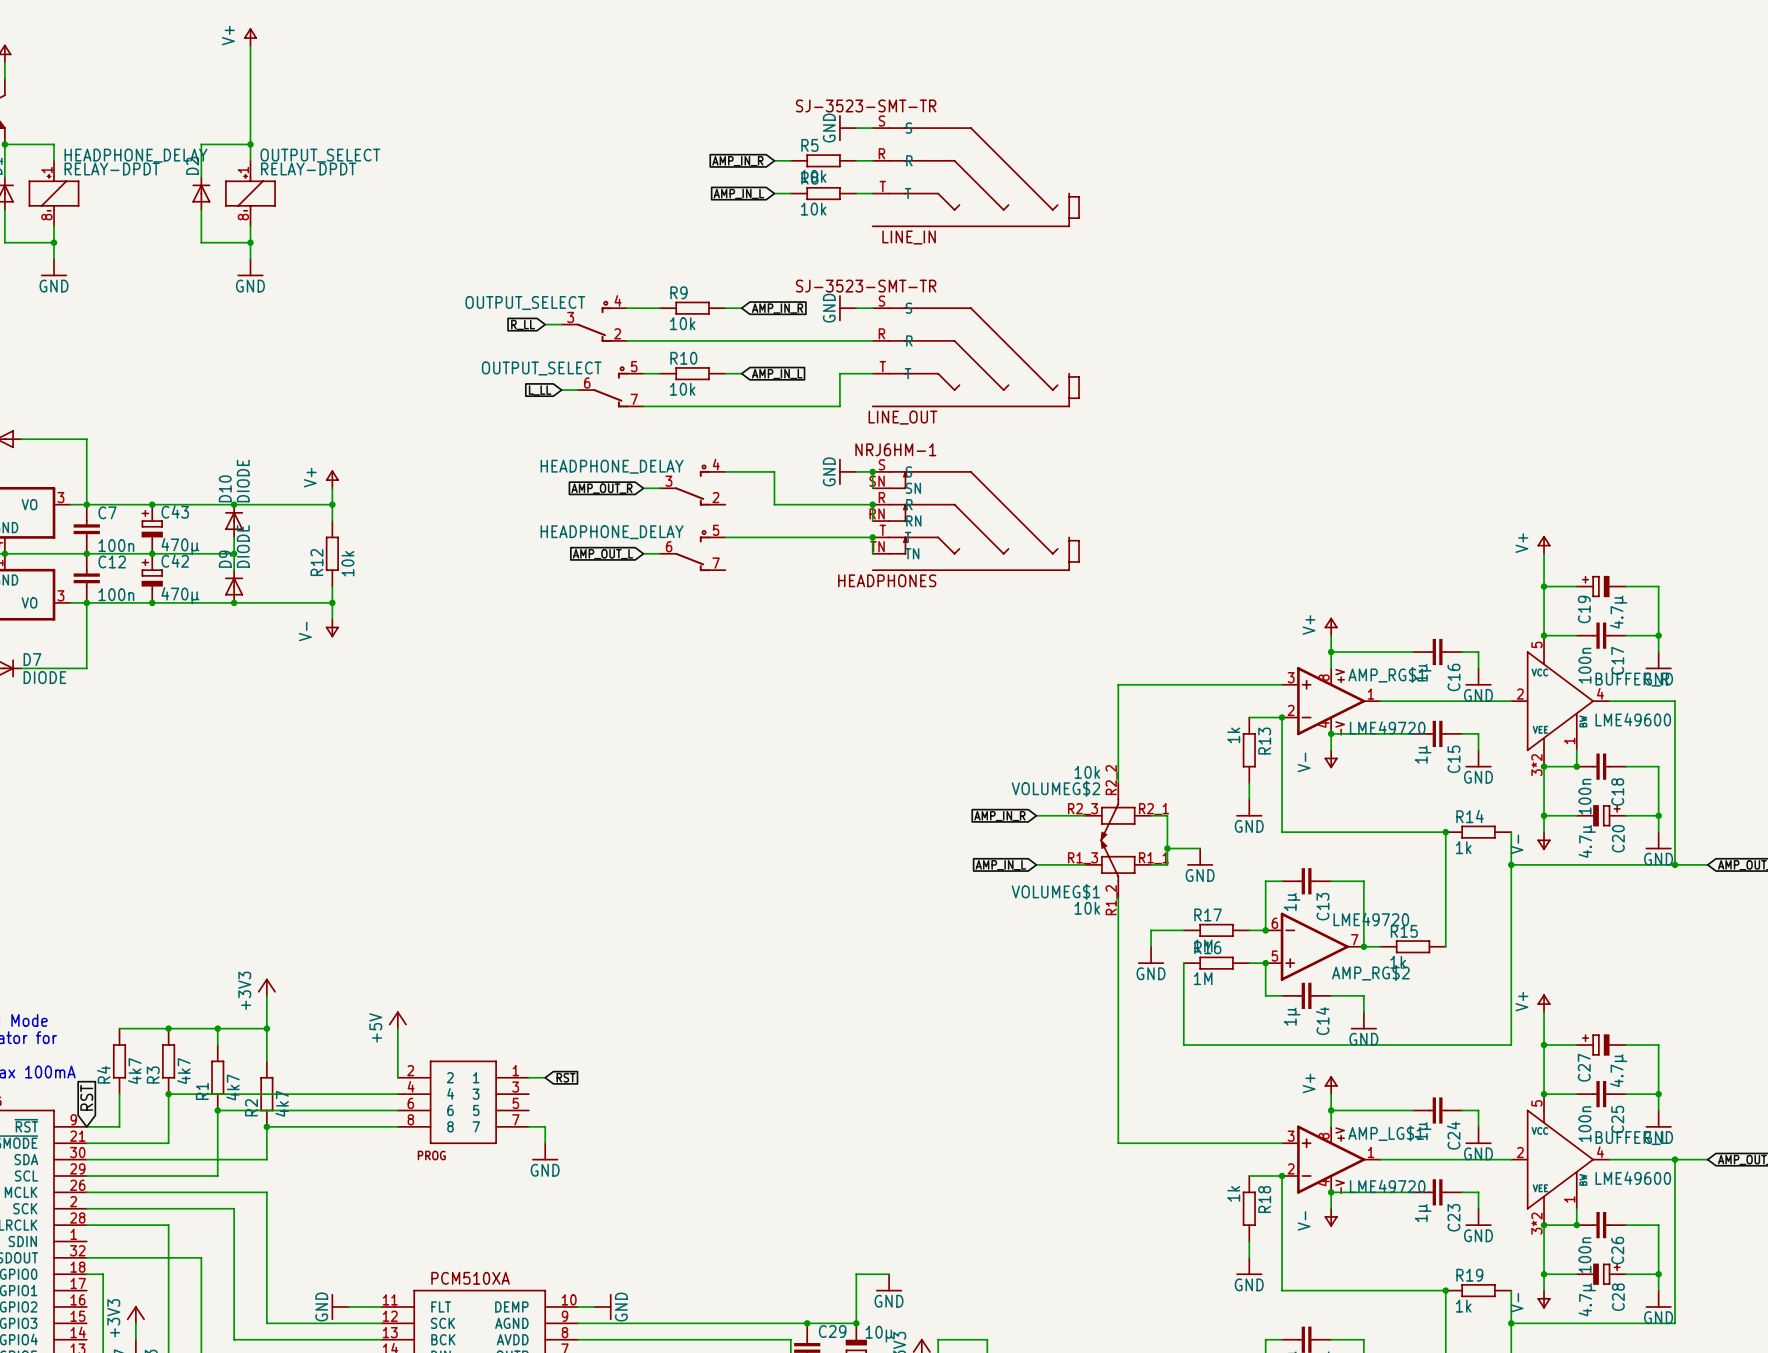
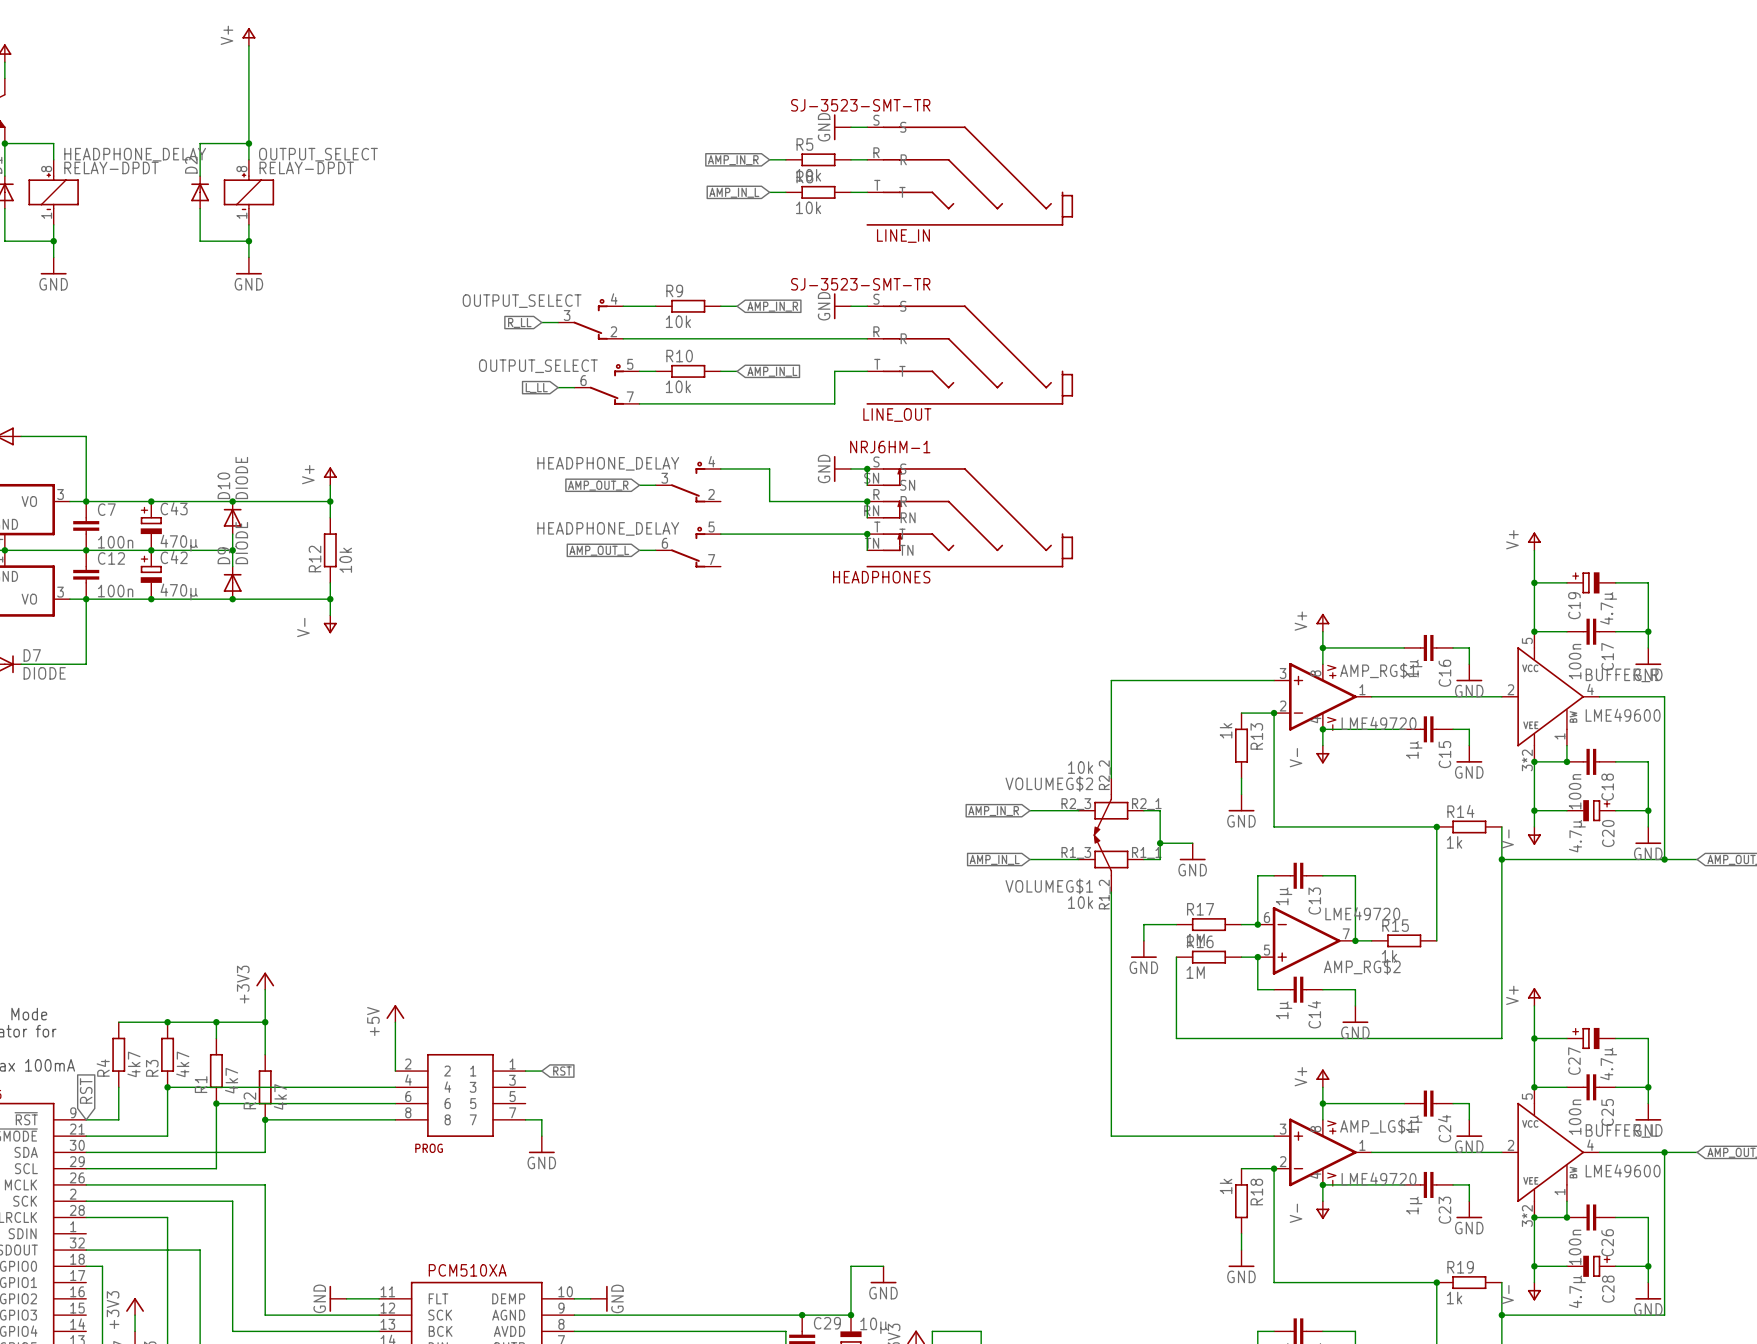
HEADPHONE_DELAY pin number: 1 (46, 170) -> 8 (46, 169)
OUTPUT_SELECT pin number: 1 (243, 170) -> 8 (241, 169)
HEADPHONE_DELAY pin number: 8 (46, 217) -> 1 (46, 215)
OUTPUT_SELECT pin number: 8 (243, 217) -> 1 (241, 215)

